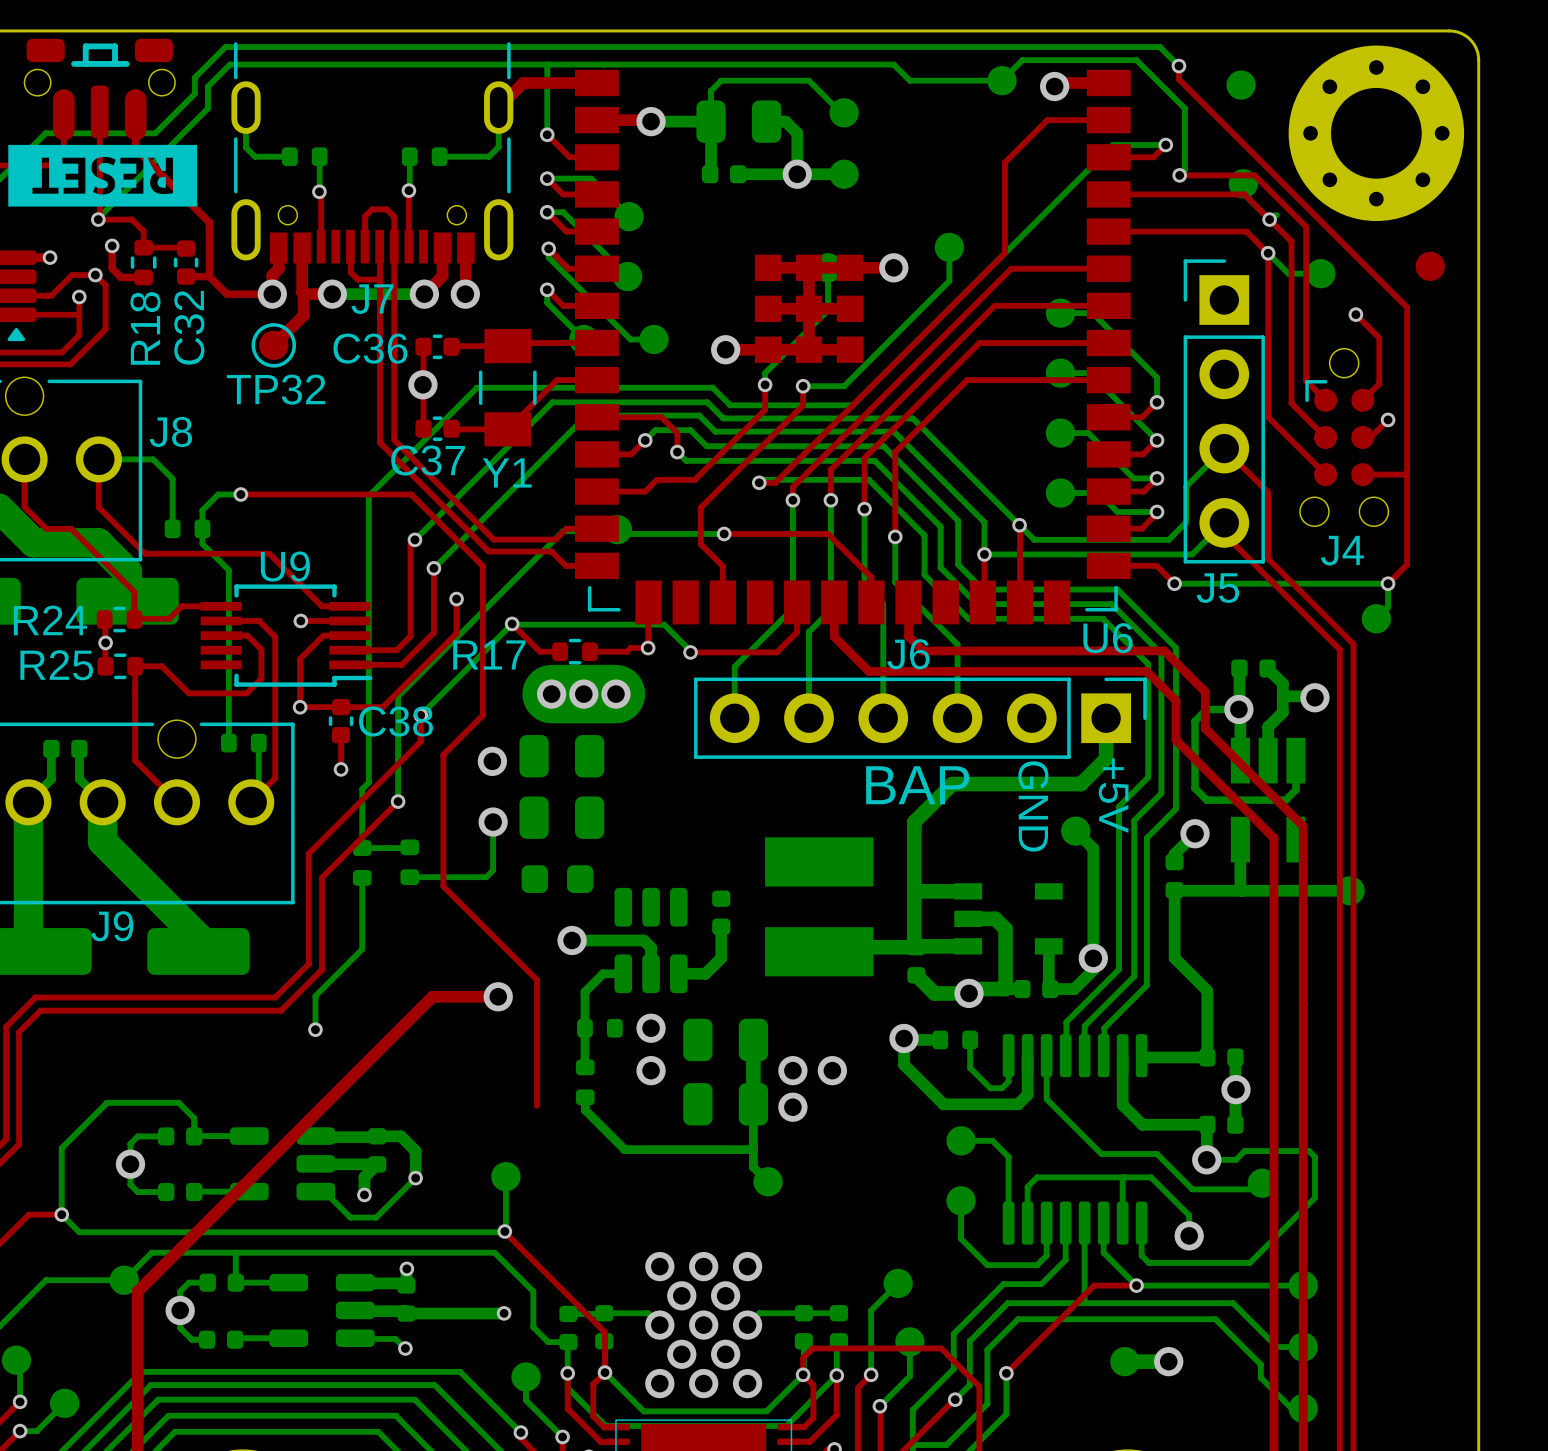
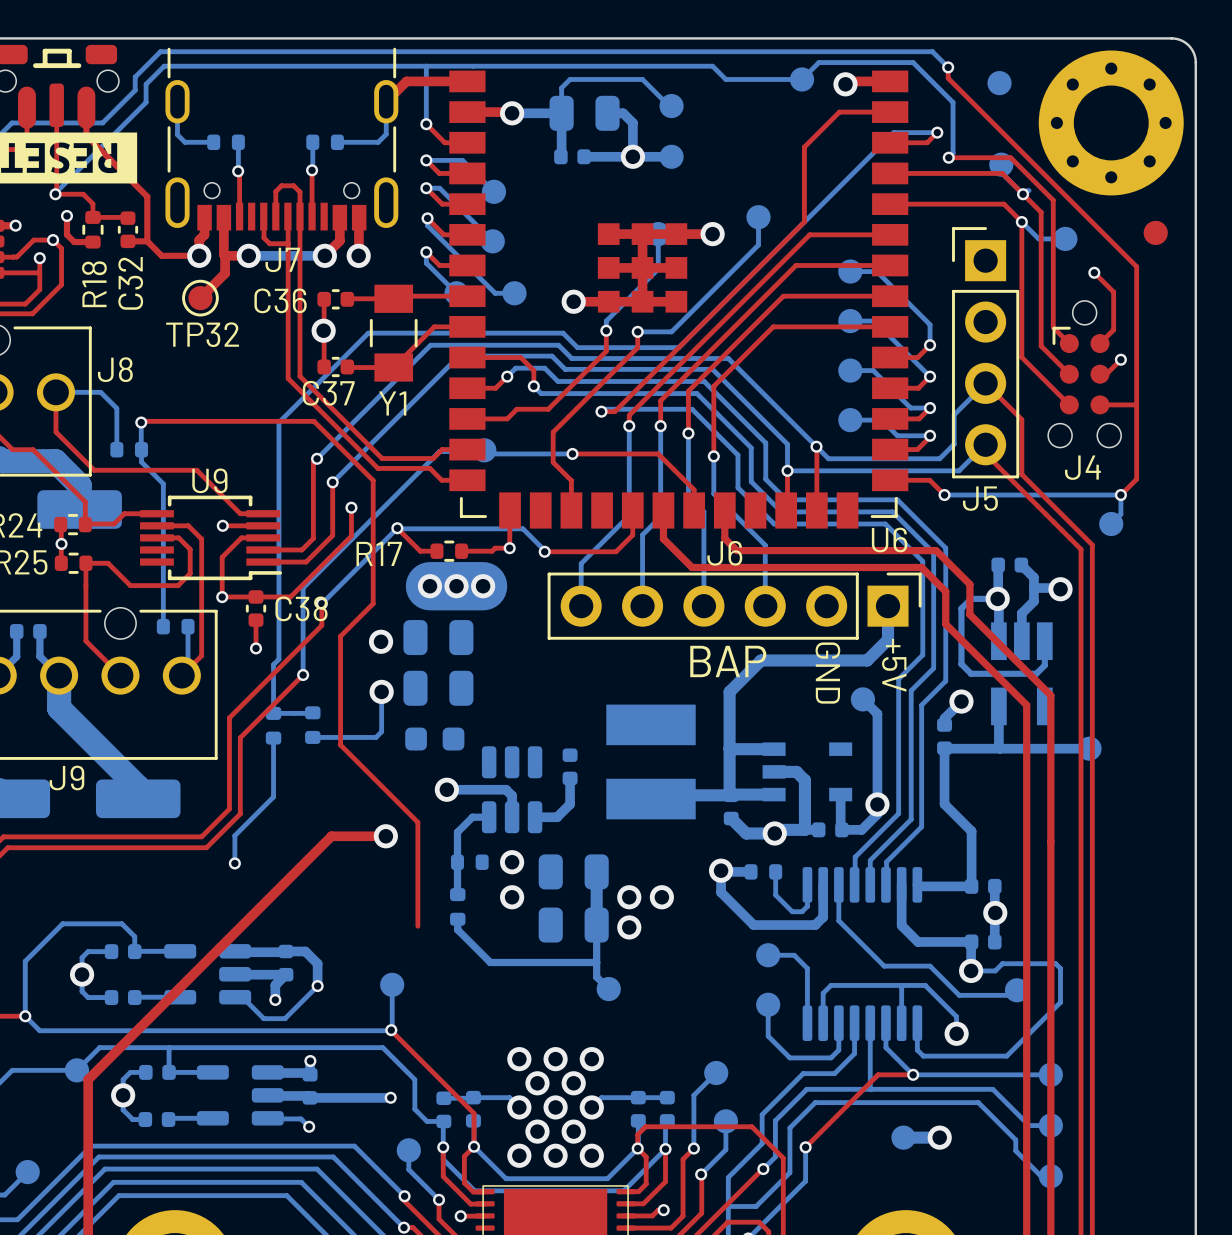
top track: none -> (173, 421) (141, 422)
bottom track: (240, 494) (218, 494) (202, 510) (202, 528) -> (141, 422) (141, 449)
via position: (240, 494) -> (141, 422)

